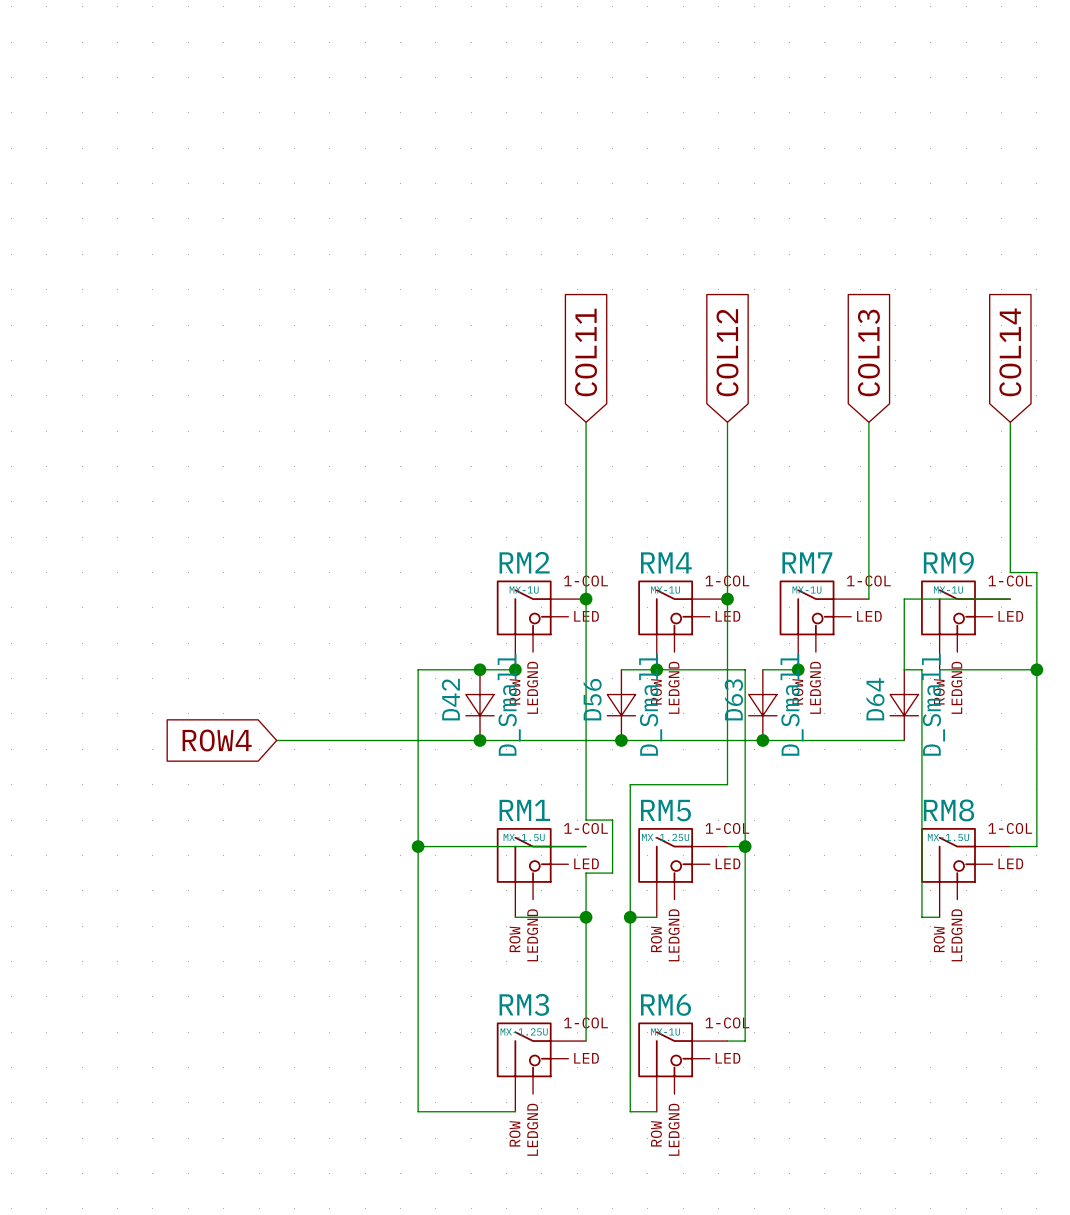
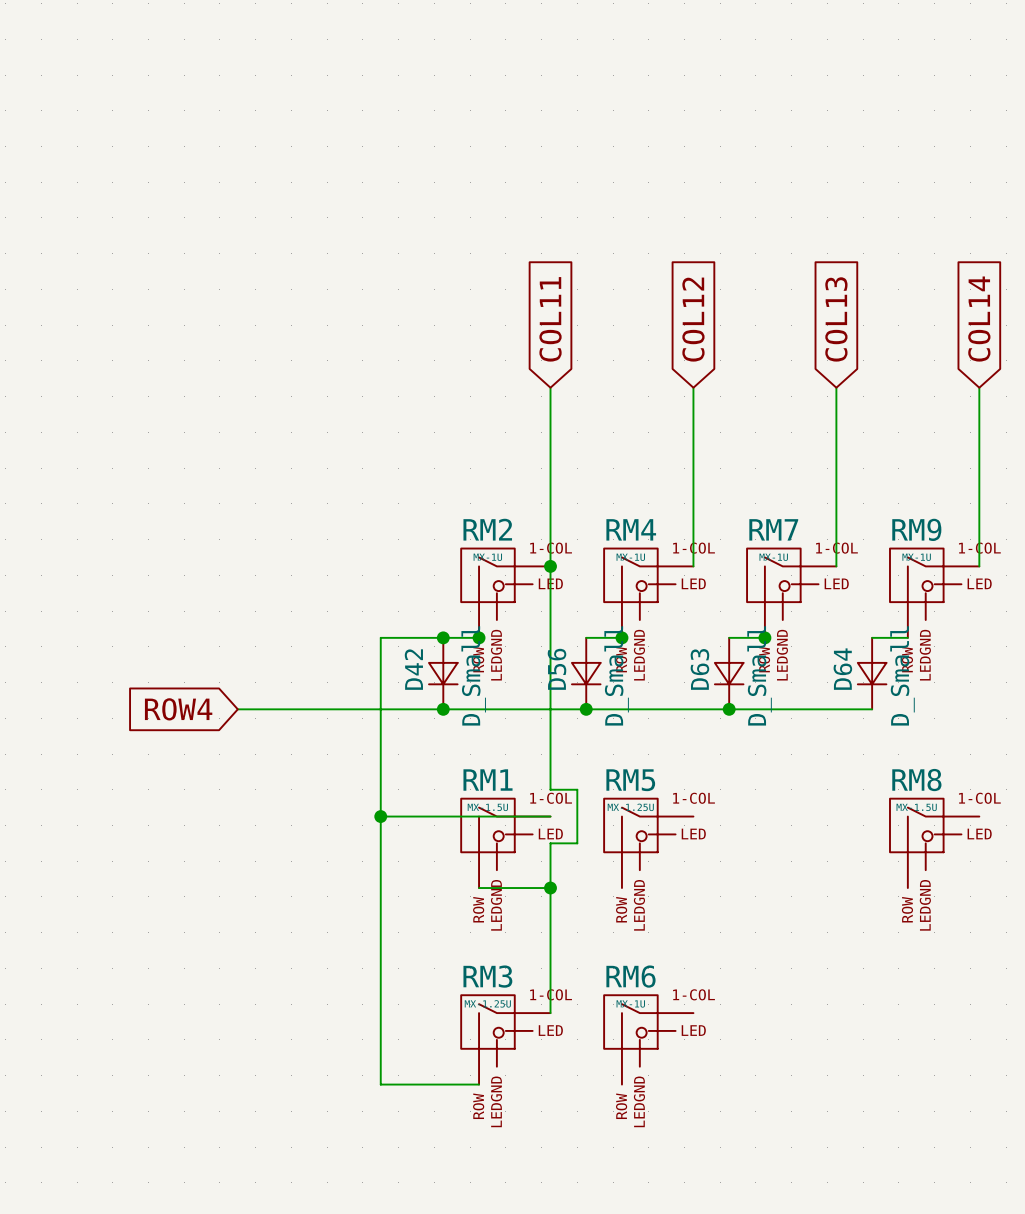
wire: (1010, 572) (1036, 572) (1036, 846) (1010, 846) -> none
wire: (727, 599) (727, 784) (630, 784) (630, 1111) (656, 1111) -> none
junction: (727, 599) -> none
wire: (1010, 599) (904, 599) (904, 669) -> (979, 566) (979, 539)
wire: (656, 669) (745, 669) (745, 1041) (727, 1041) -> none
wire: (921, 669) (921, 917) (939, 917) -> none
wire: (939, 669) (1036, 669) -> (907, 637) (889, 637)
junction: (1036, 669) -> none
wire: (727, 846) (745, 846) -> none
junction: (745, 846) -> none
wire: (630, 917) (656, 917) -> none
junction: (630, 917) -> none

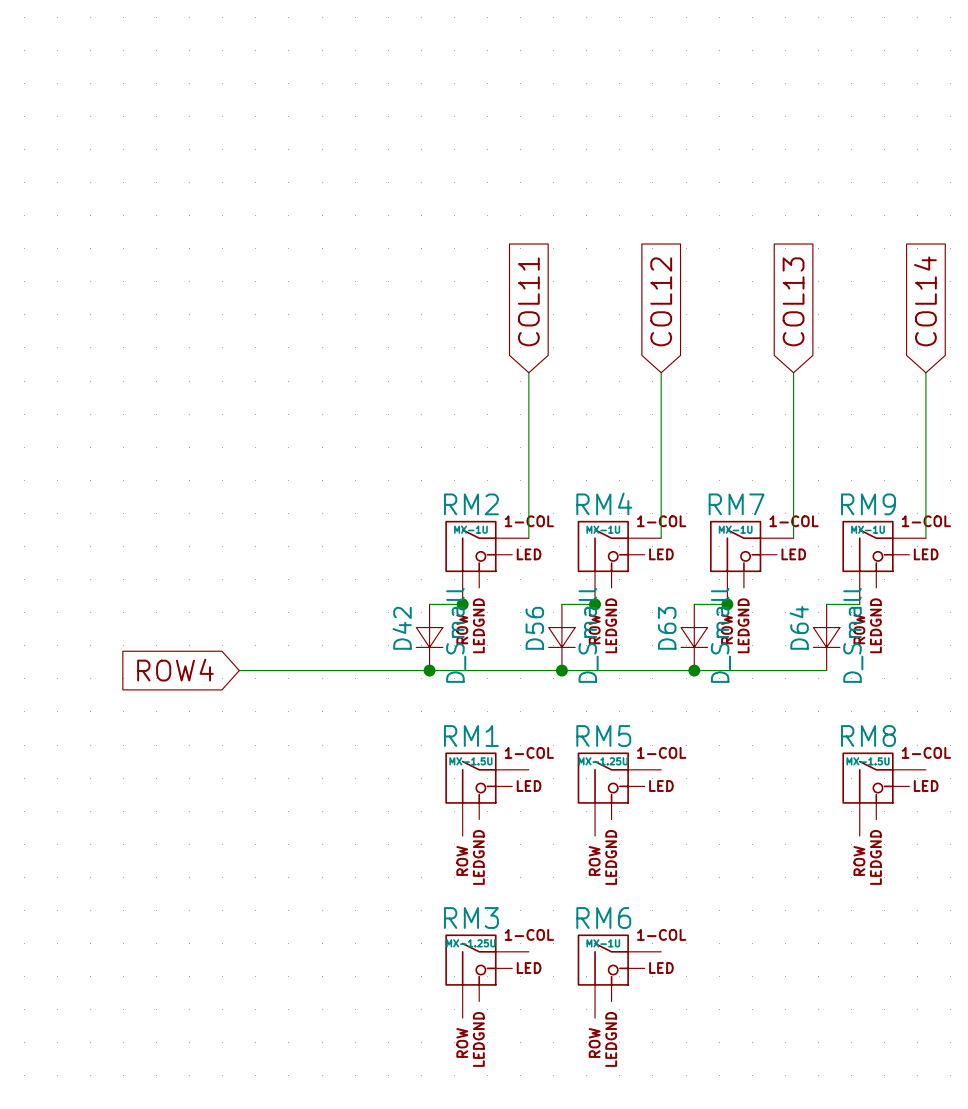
wire: (550, 566) (550, 789) (577, 789) (577, 843) (550, 843) (550, 1013) -> none
junction: (550, 566) -> none
wire: (443, 637) (380, 637) (380, 1084) (479, 1084) -> none
junction: (443, 637) -> none
wire: (380, 816) (550, 816) -> none
junction: (380, 816) -> none
wire: (479, 888) (550, 888) -> none
junction: (550, 888) -> none

